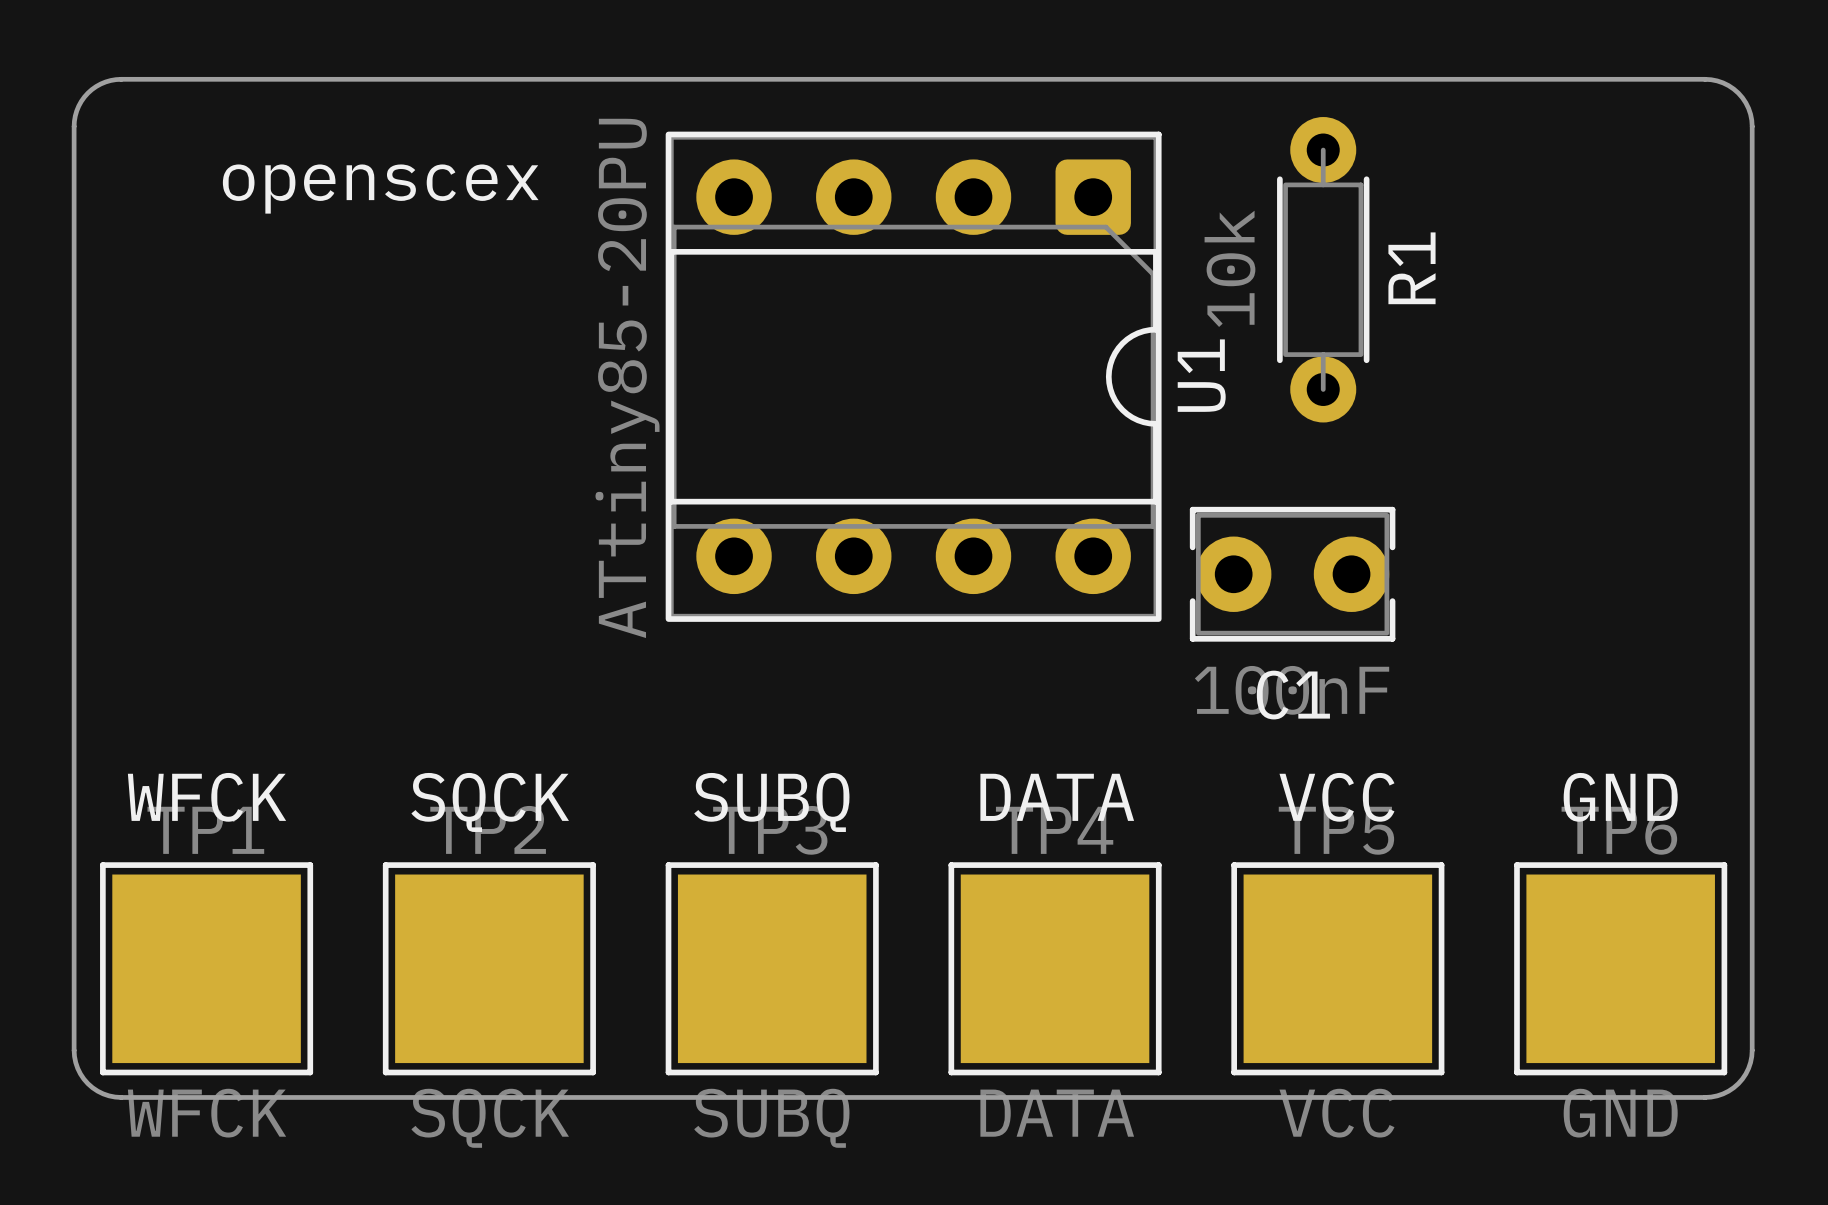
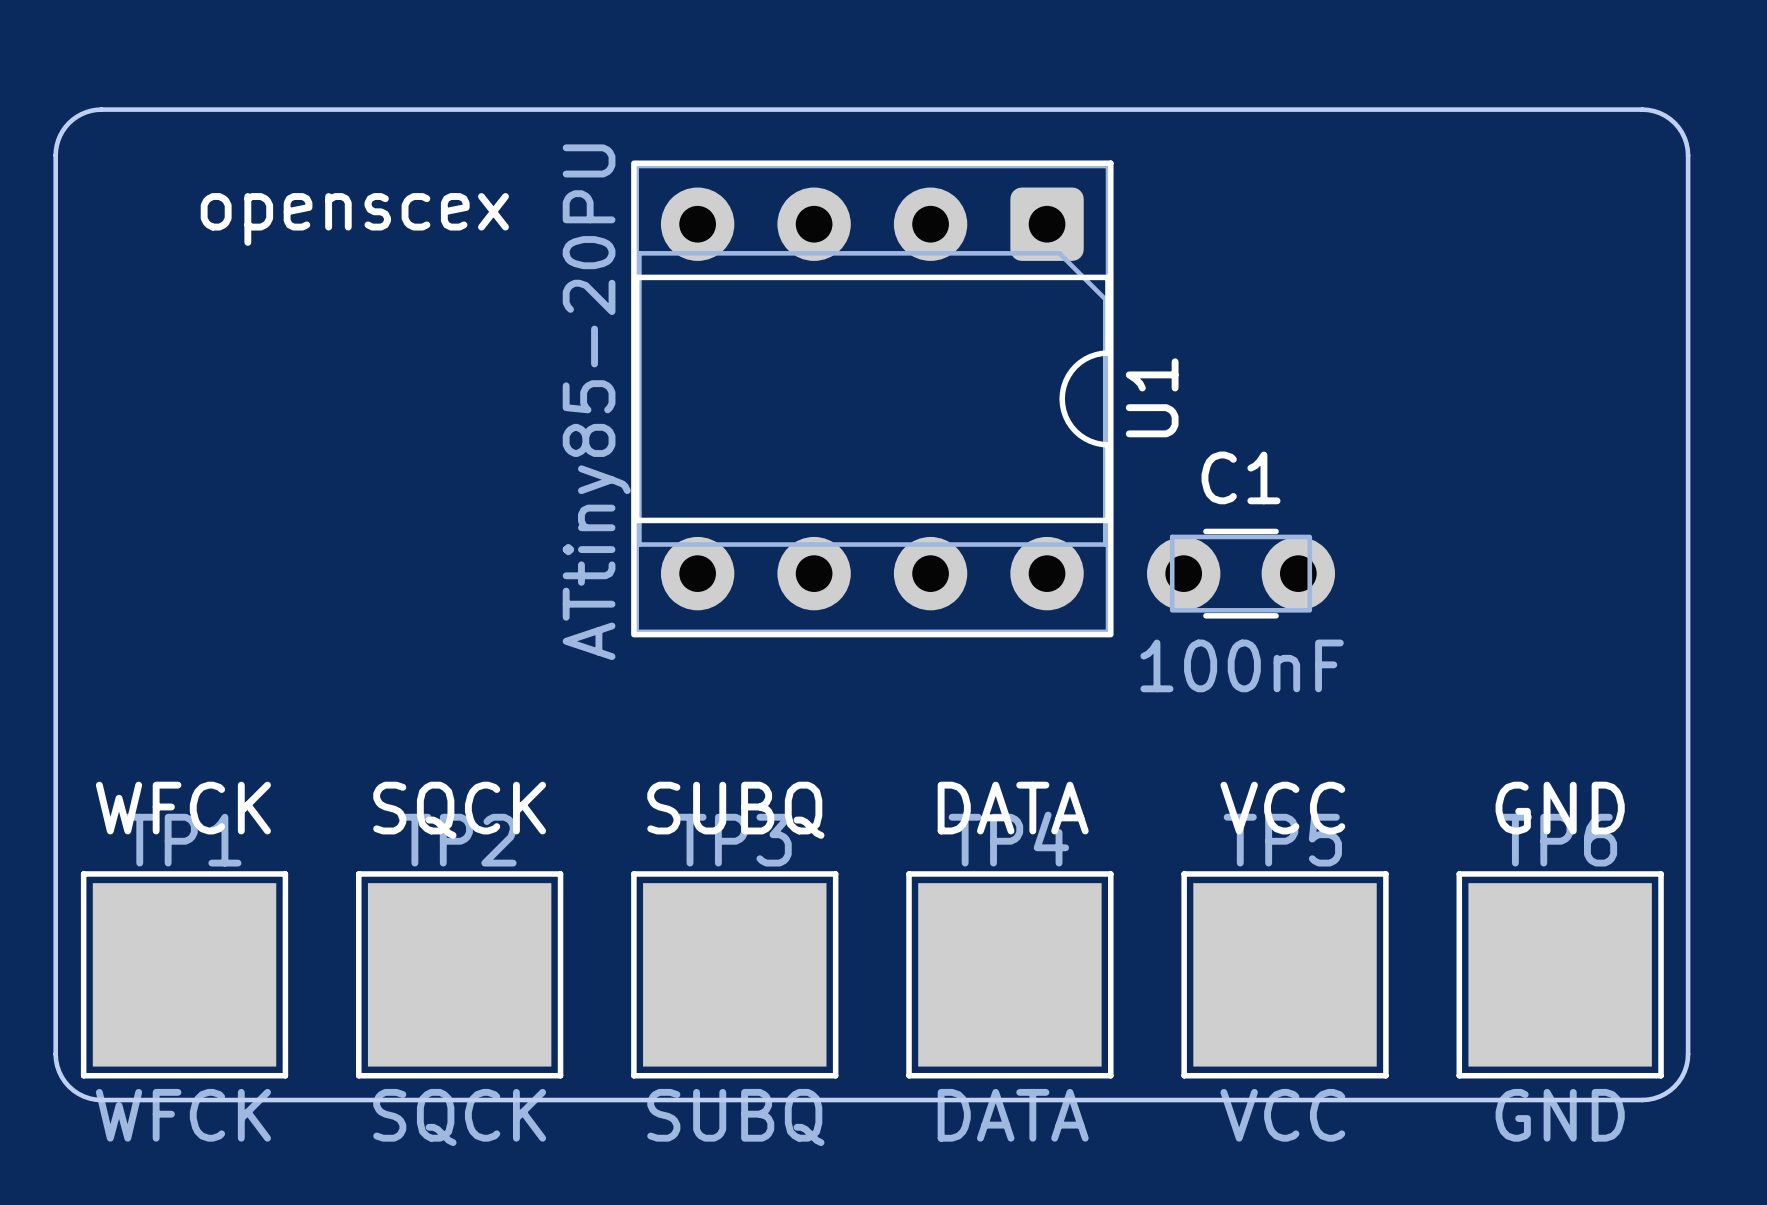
R1: 10k (1323, 269) -> none
C1 footprint: [1189, 506, 1396, 642] -> [1147, 528, 1336, 619]
C1 name position: C1 (1293, 695) -> C1 (1241, 477)

